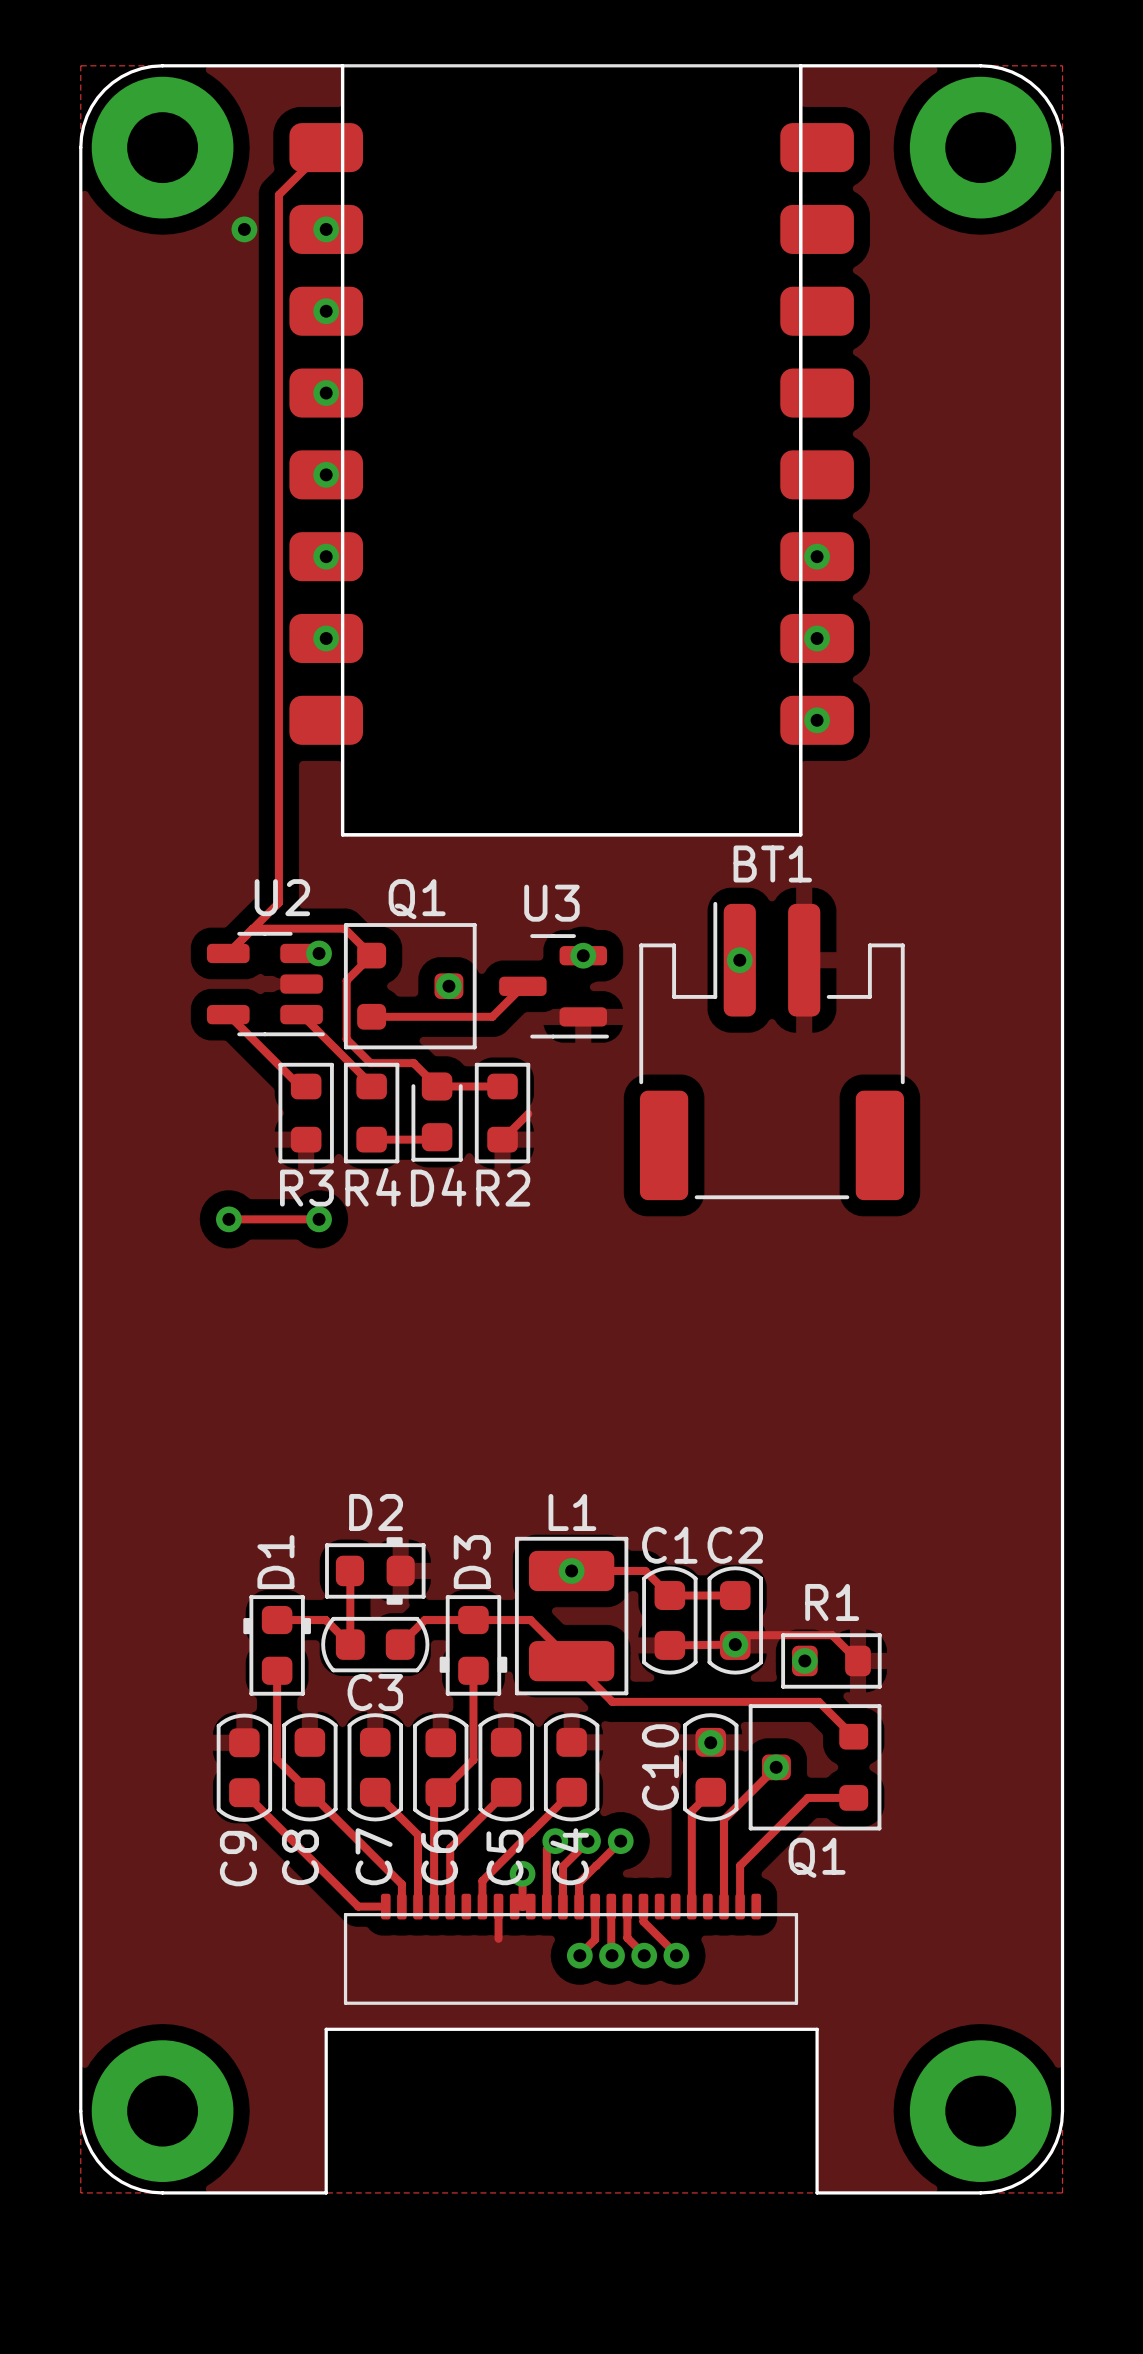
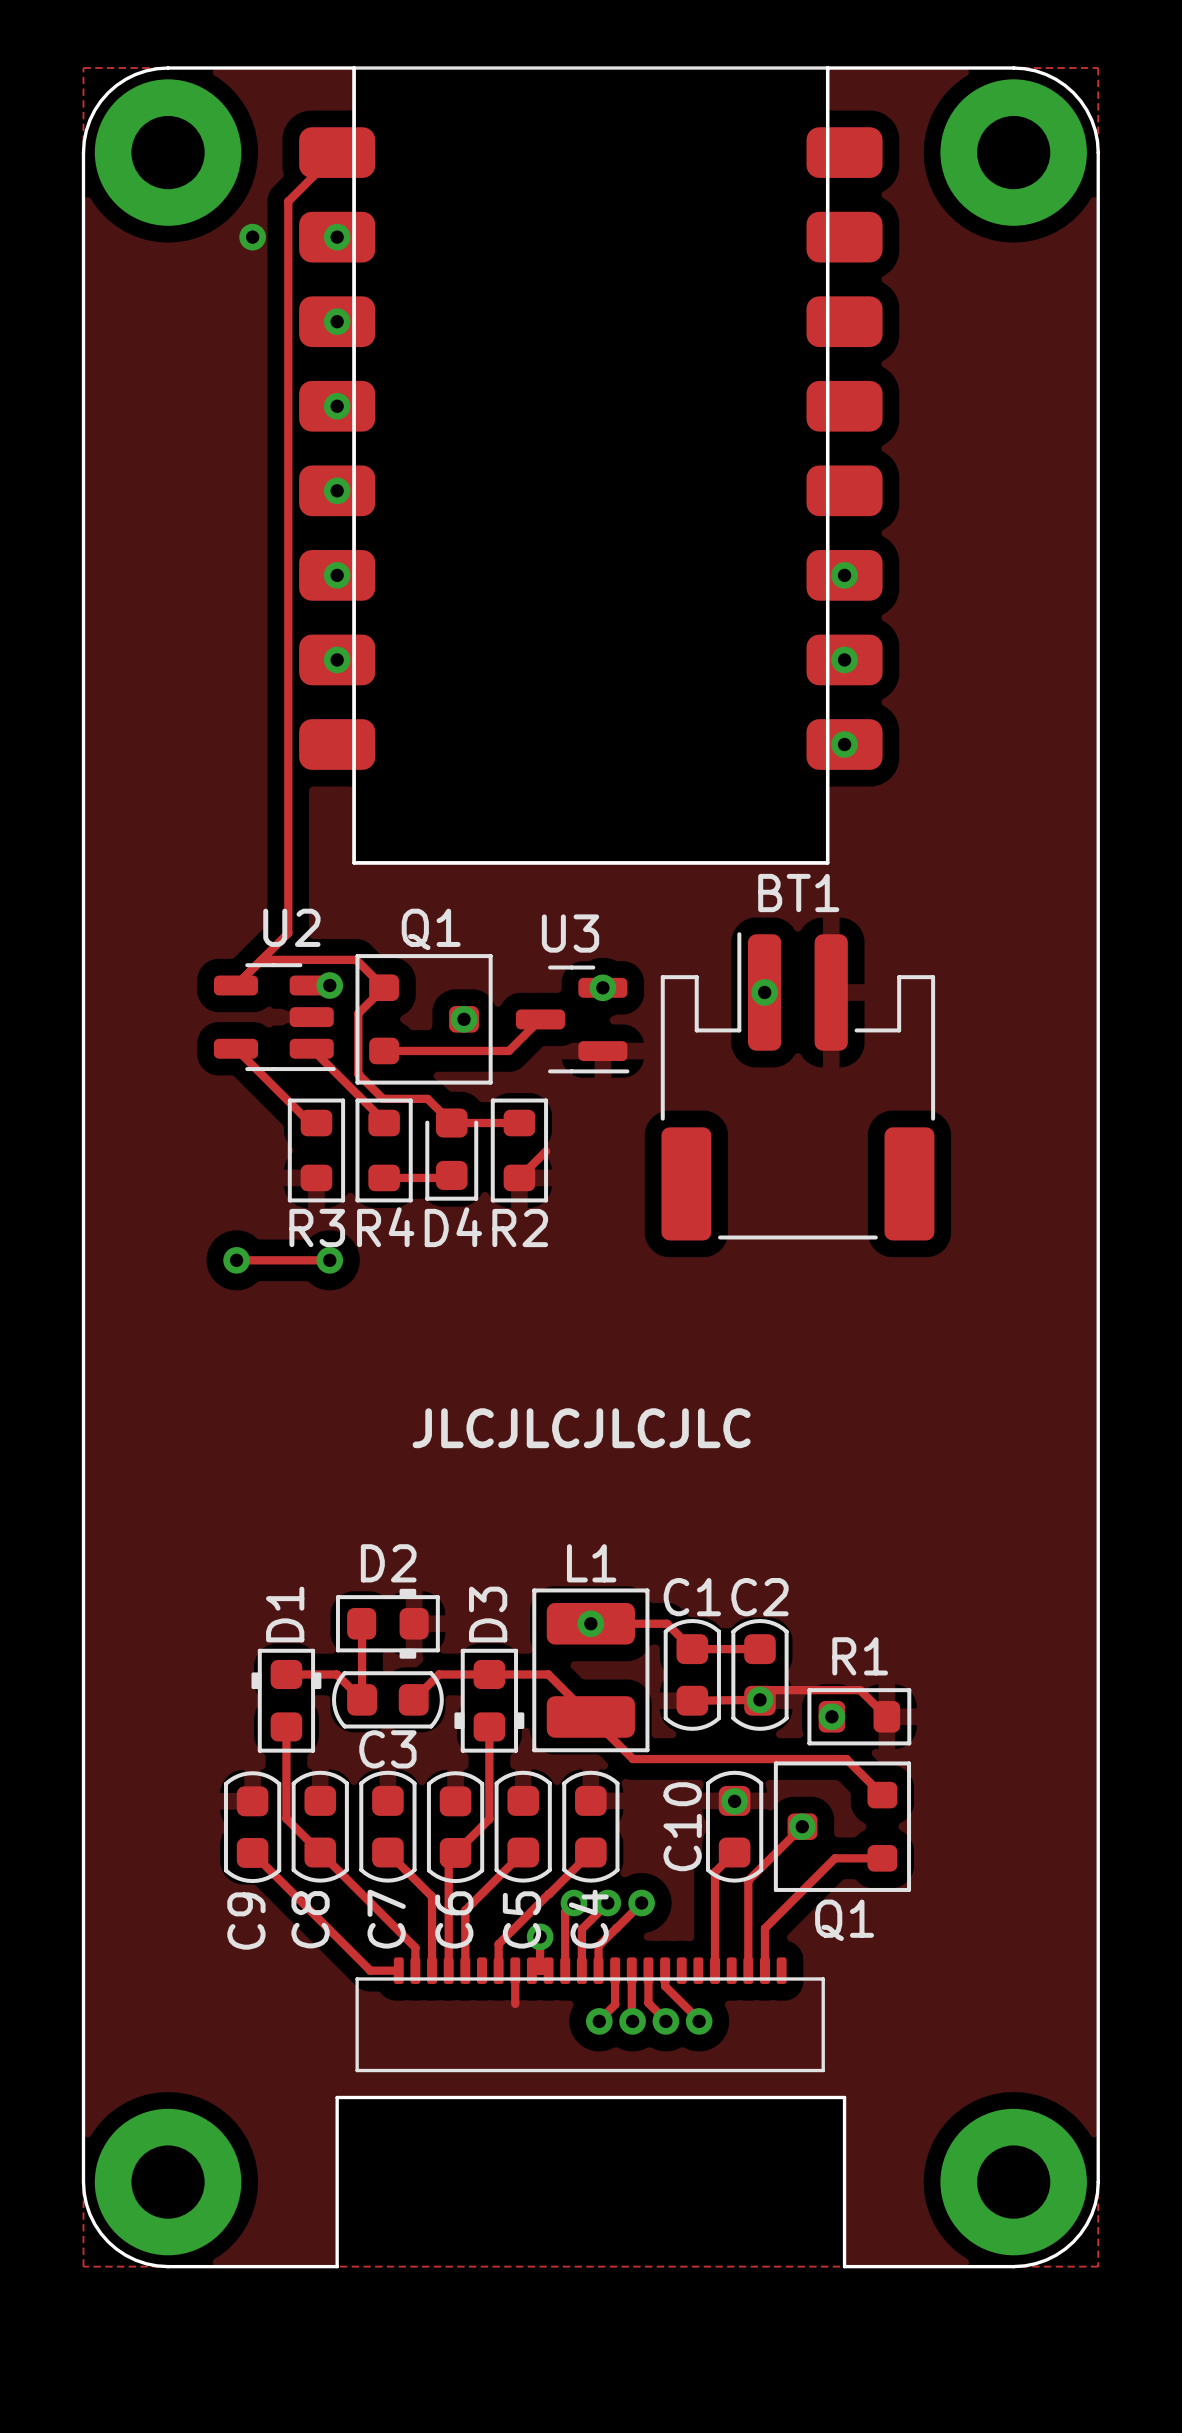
text: none -> JLCJLCJLCJLC (581, 1428)

